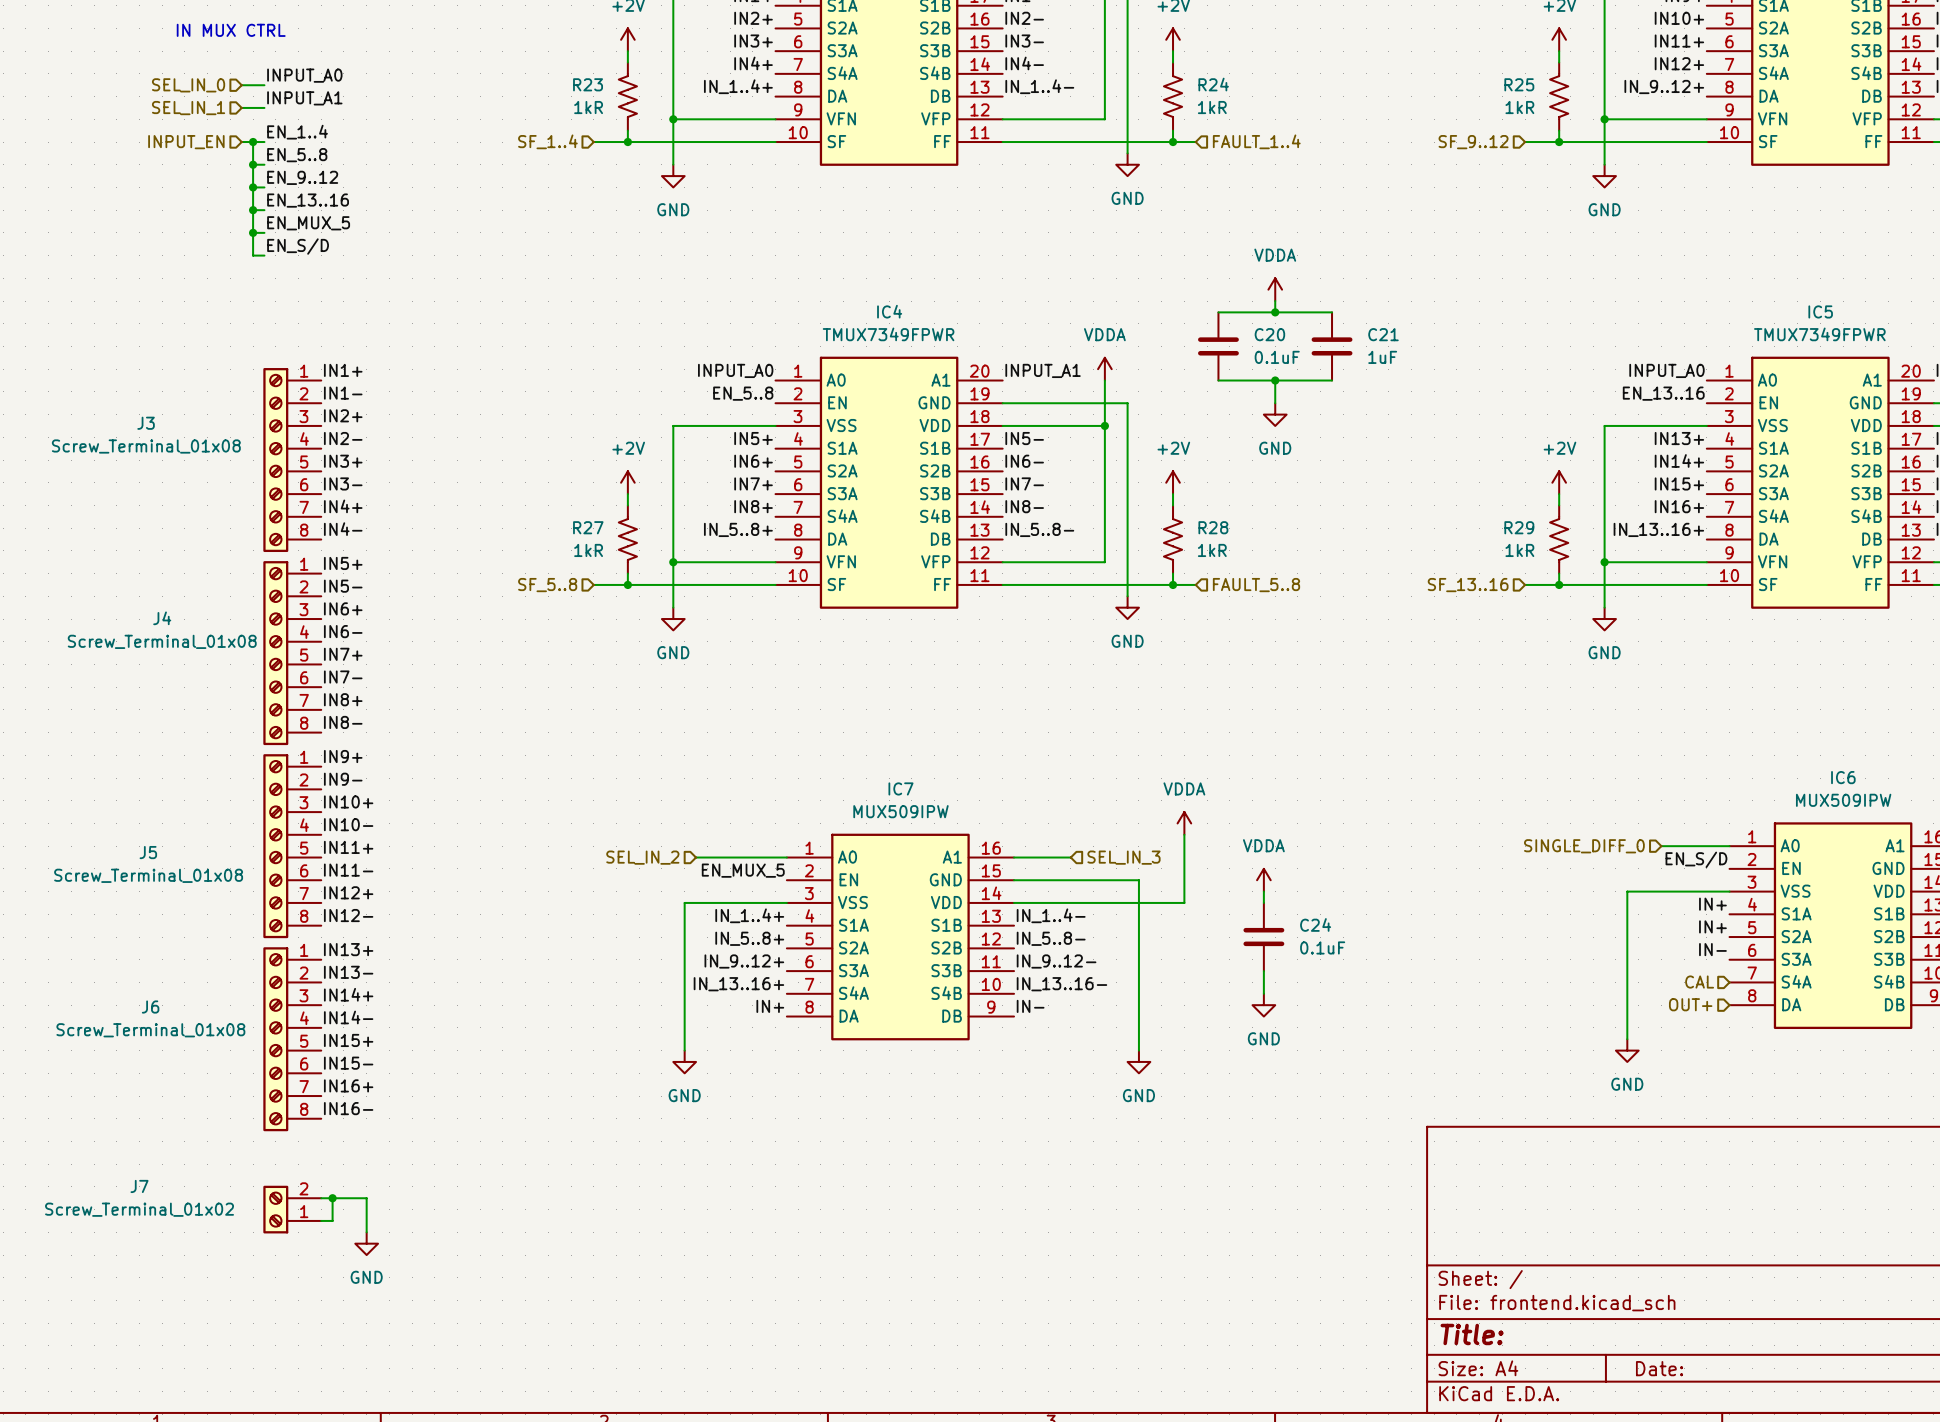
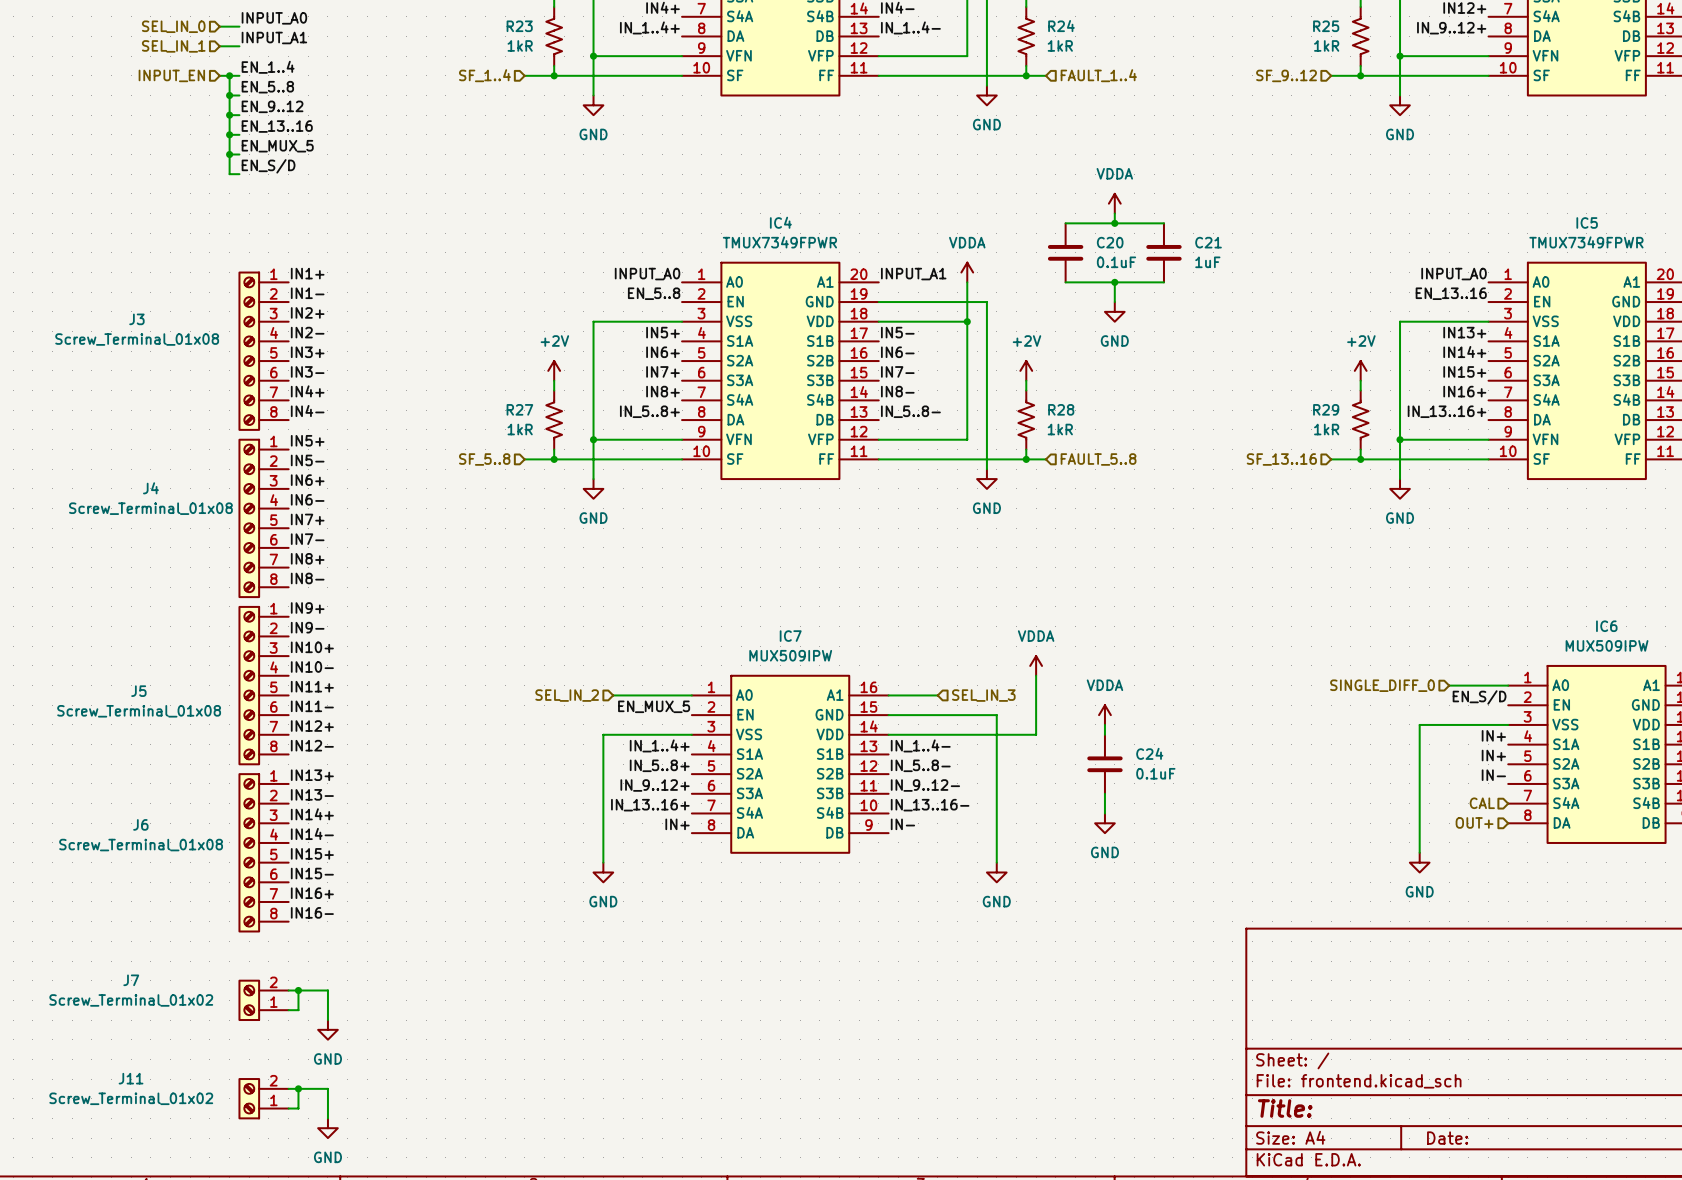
wire: none -> (288, 1088) (327, 1088) (327, 1118)
wire: none -> (298, 1088) (298, 1108) (288, 1108)
junction: none -> (298, 1088)
J11: none -> Screw_Terminal_01x02 (263, 1098)
power symbol: none -> GND (327, 1128)

